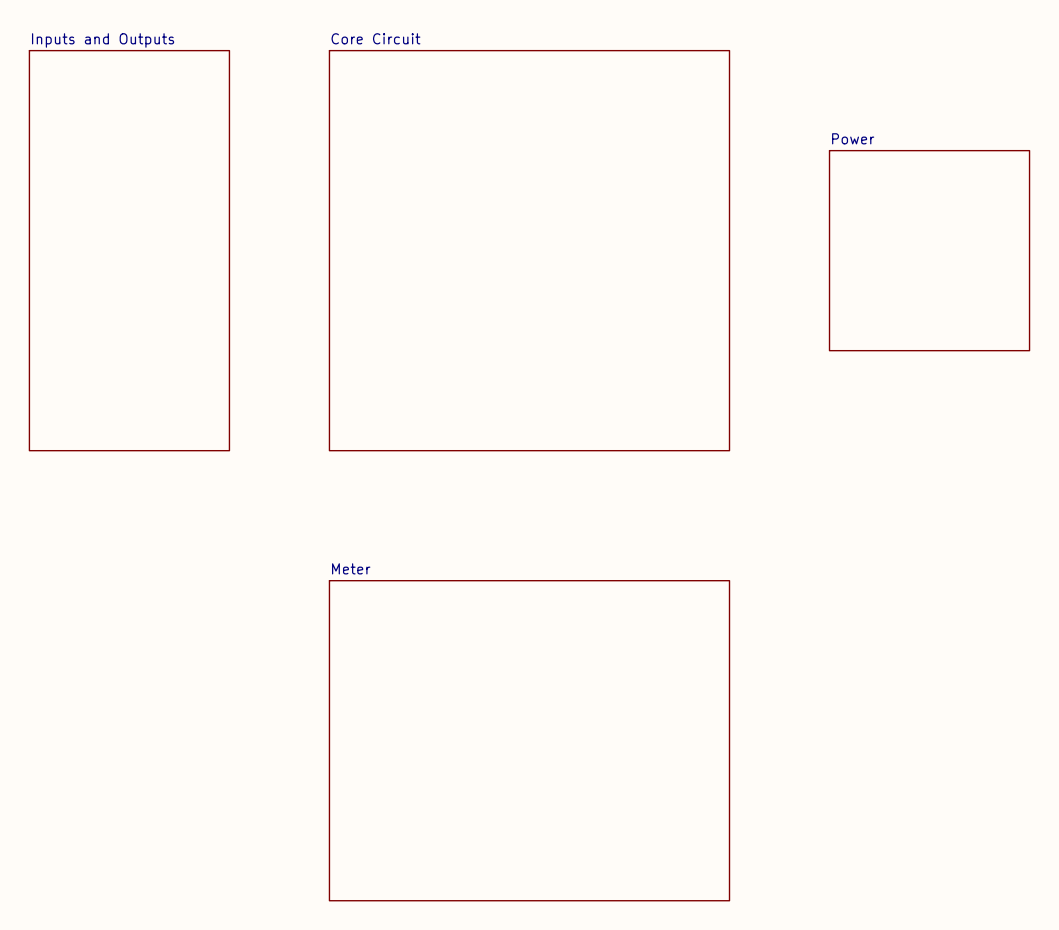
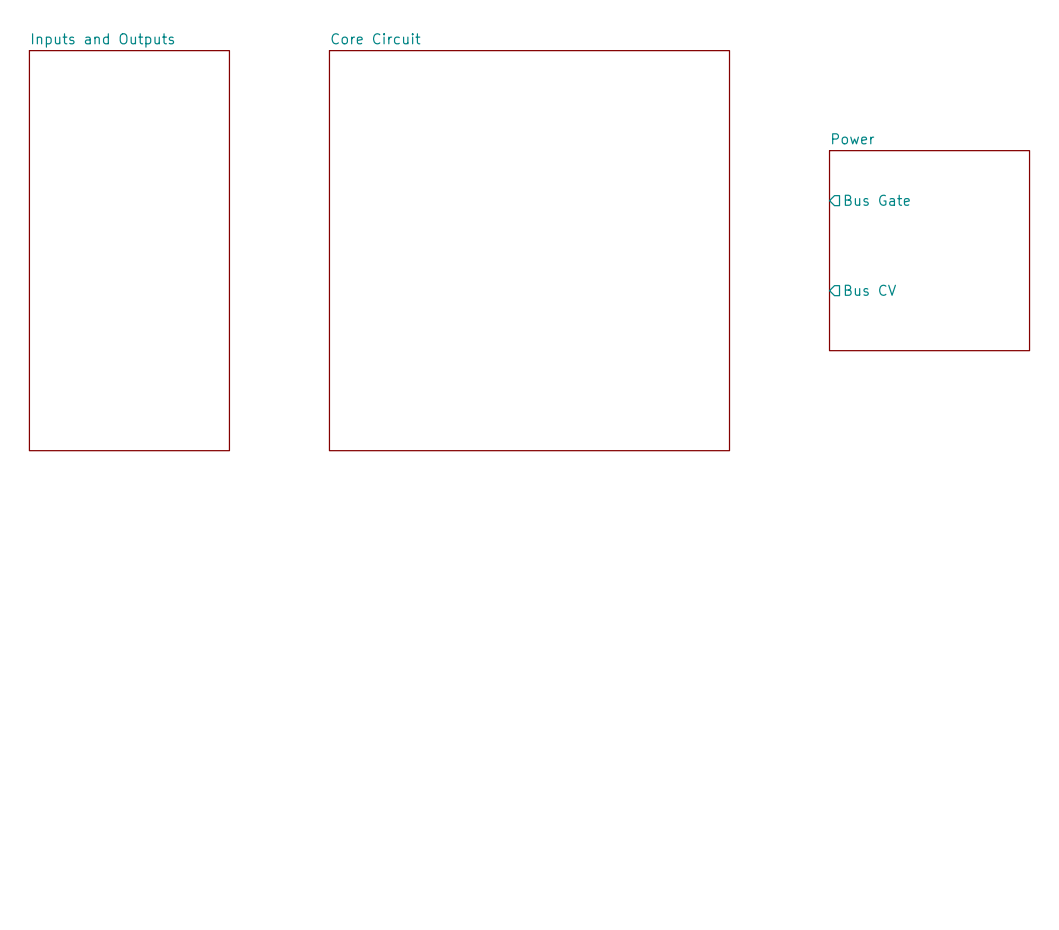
sheet pin: none -> Bus Gate (877, 200)
sheet pin: none -> Bus CV (870, 290)
sheet Meter: (529, 740) -> none

